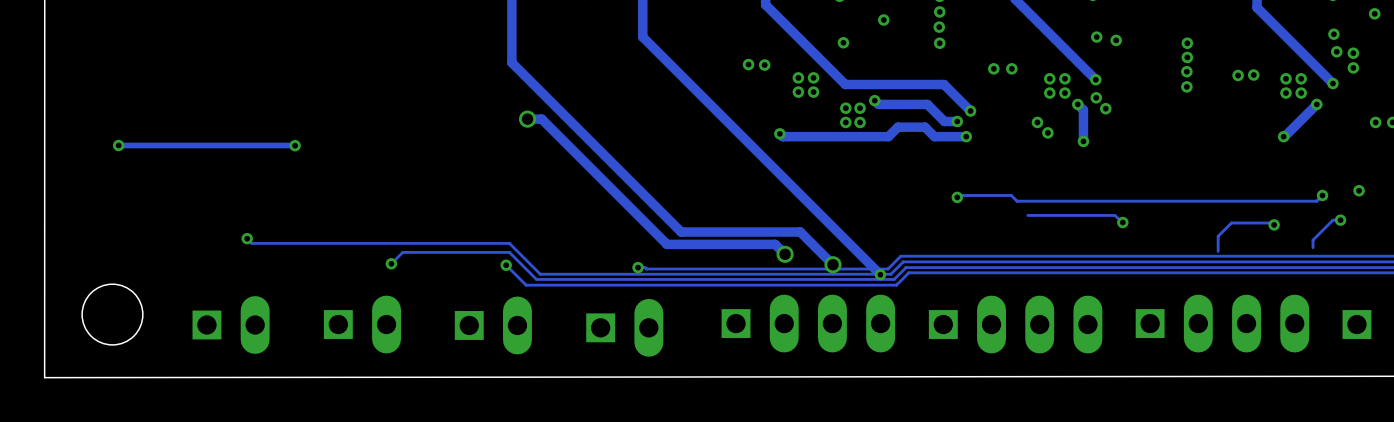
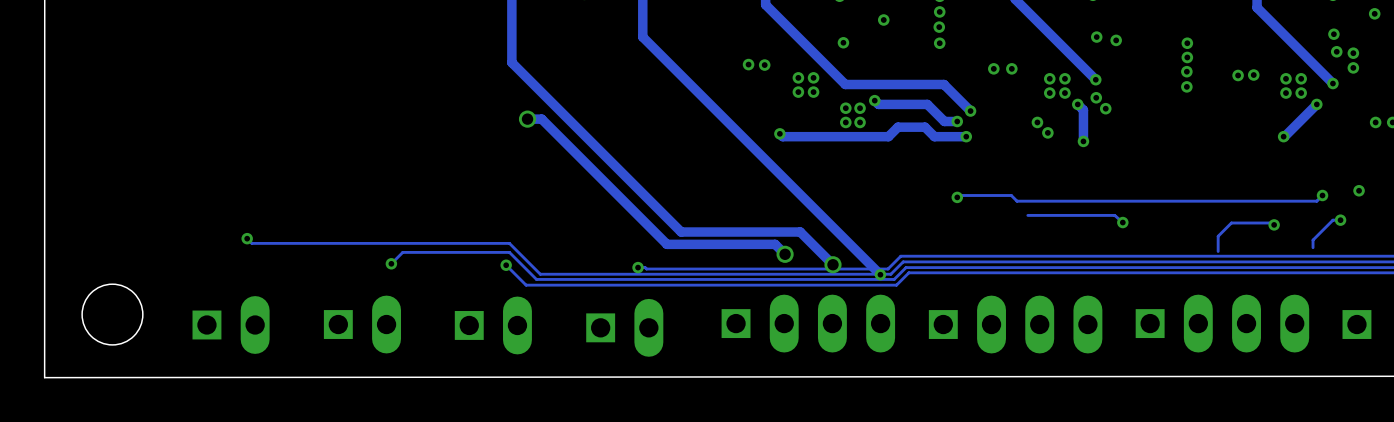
via: (118, 145) -> none
track: (294, 145) (118, 145) -> none
via: (295, 145) -> none

